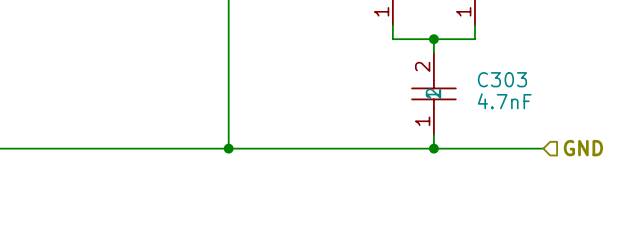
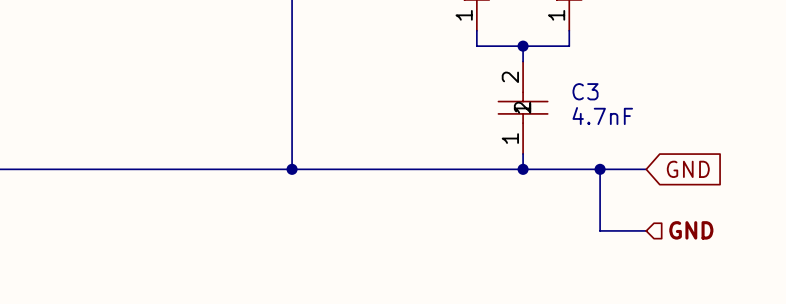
C303 name: C303 (502, 79) -> C3 (585, 91)
wire: none -> (600, 169) (600, 230) (646, 230)
junction: none -> (600, 169)
global label: none -> GND (688, 169)
hierarchical label position: GND (583, 148) -> GND (691, 230)

